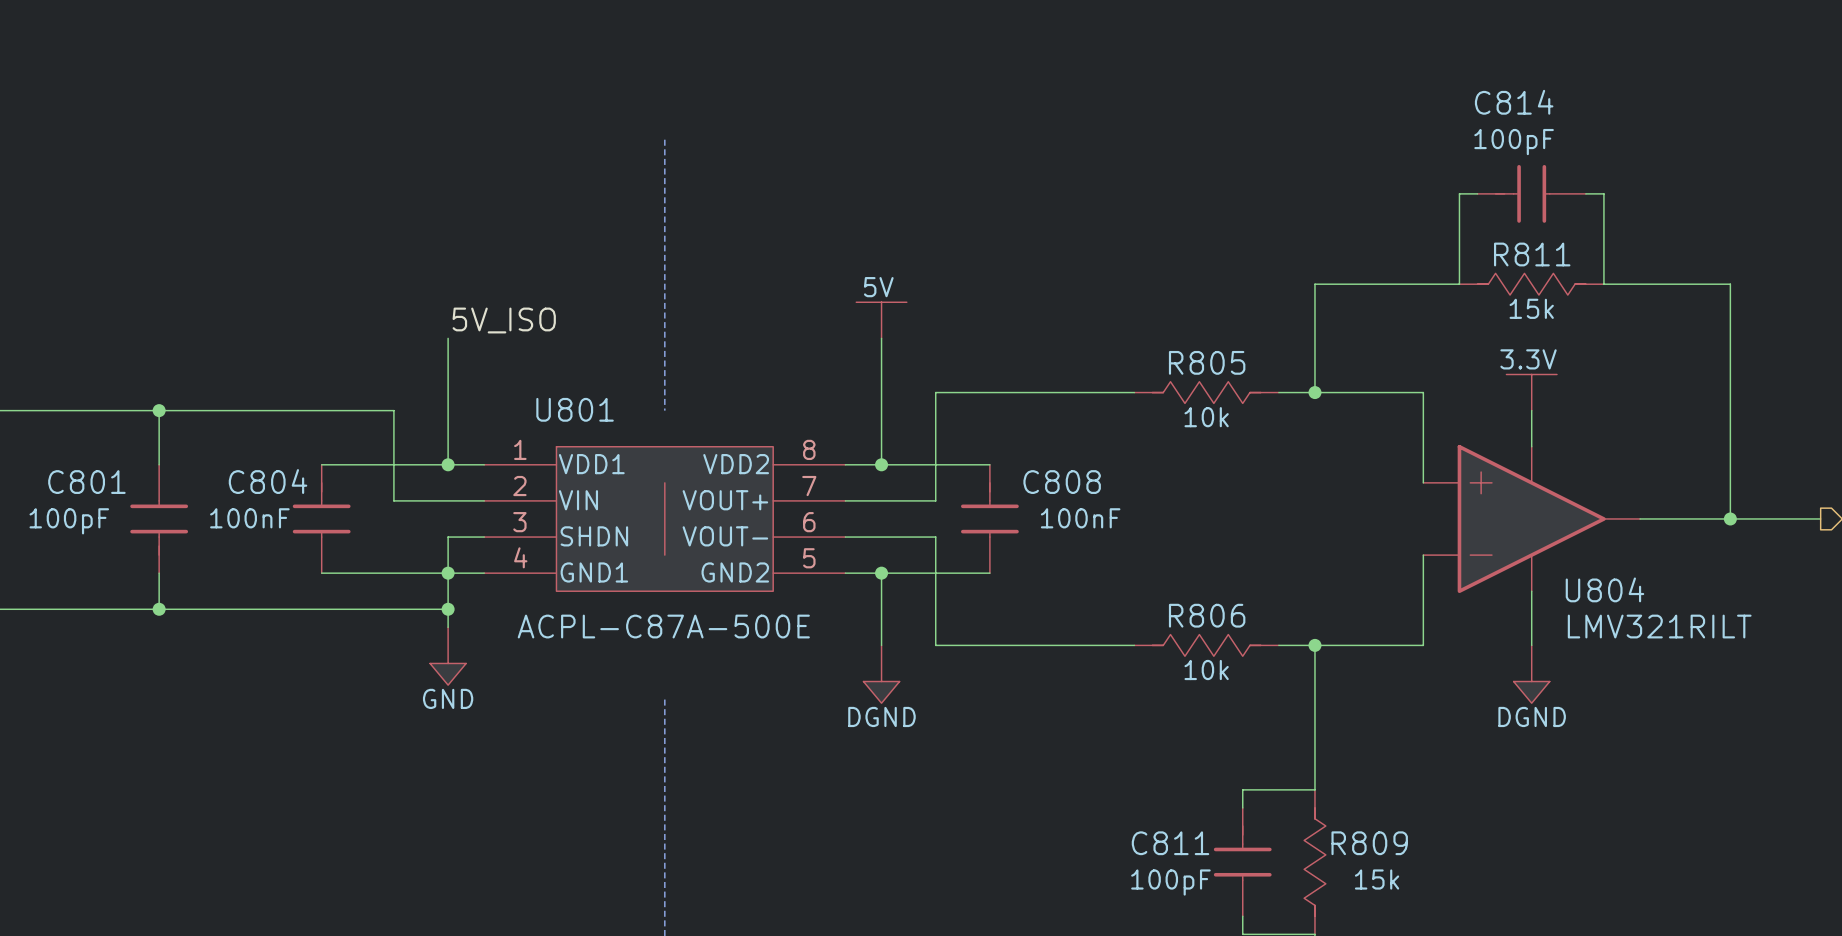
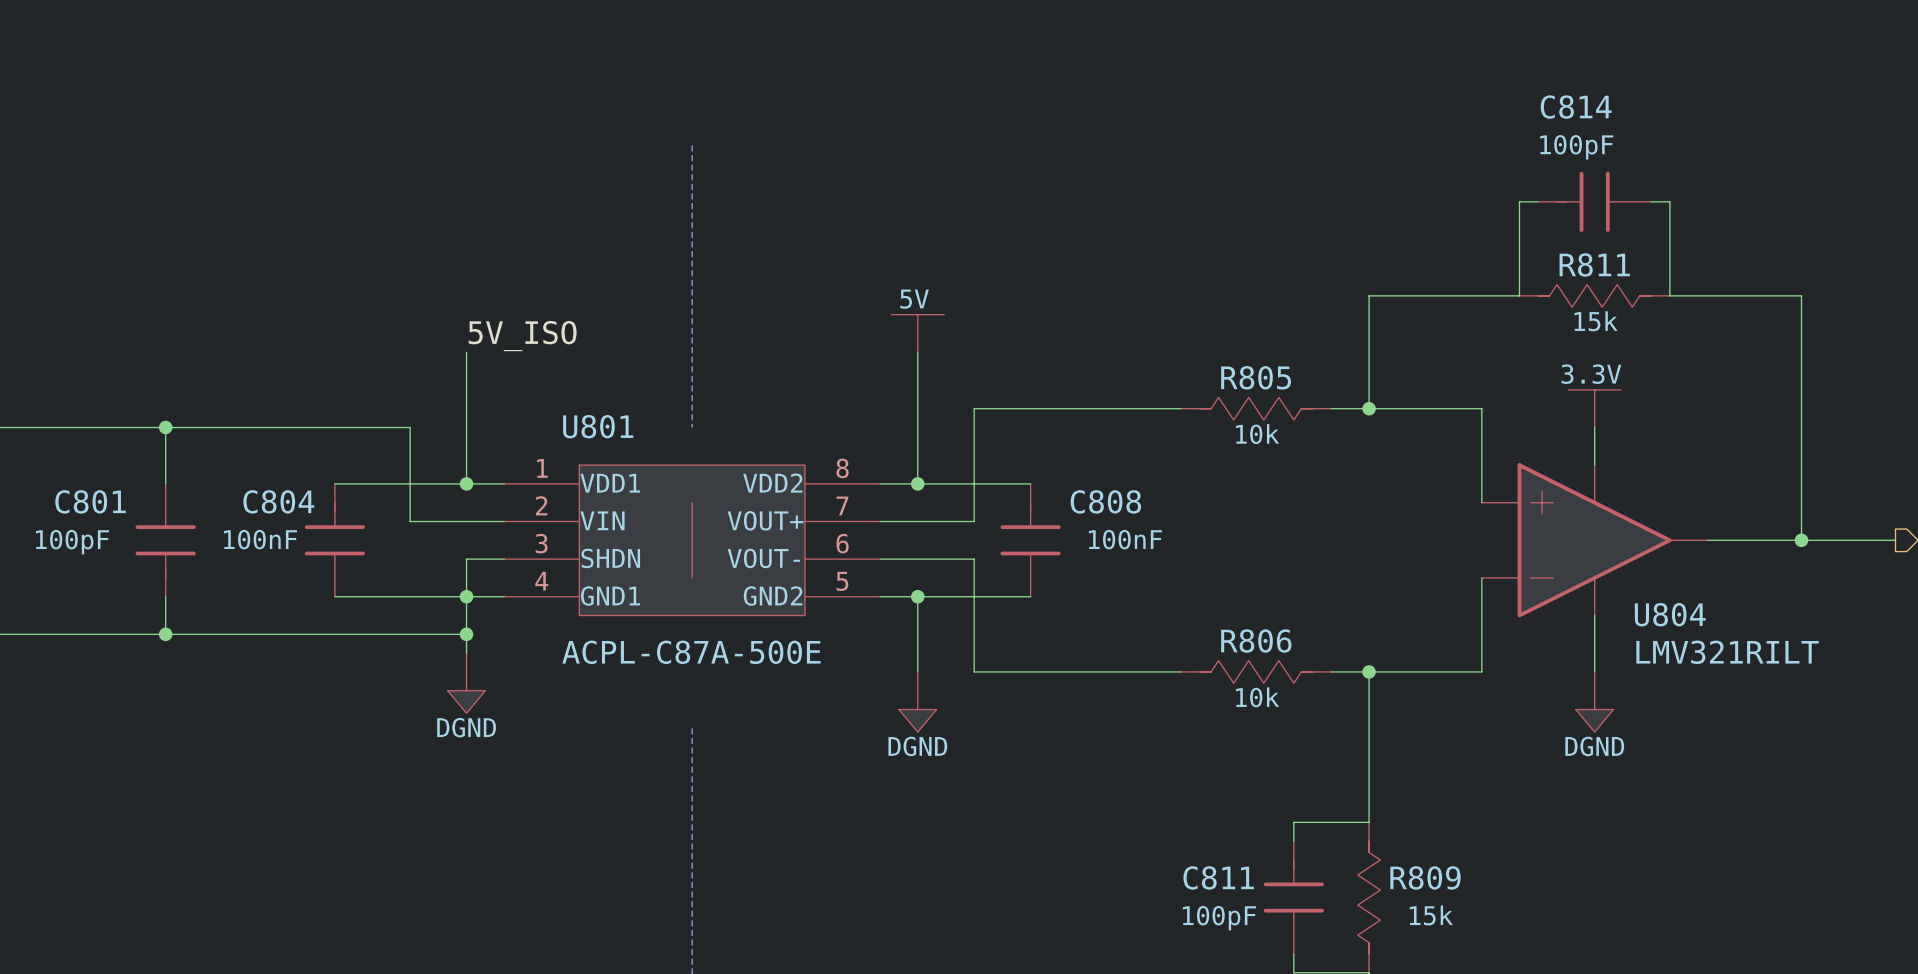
power symbol: GND (448, 656) -> DGND (466, 683)

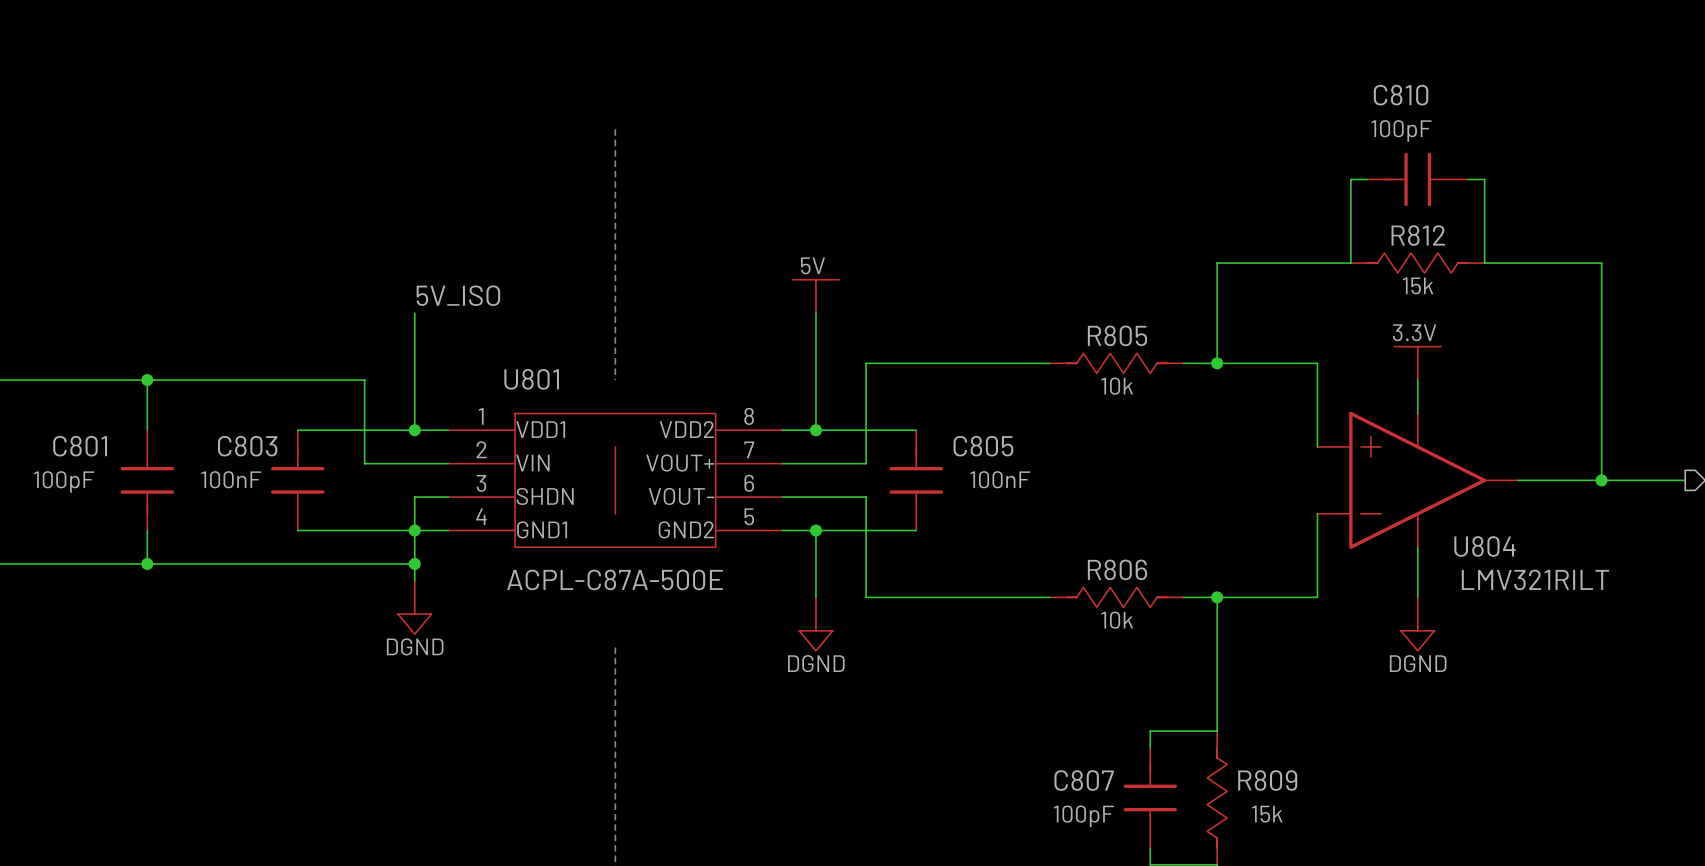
C814 name: C814 (1576, 107) -> C810 (1401, 95)
R811 name: R811 (1594, 264) -> R812 (1418, 235)
C804 name: C804 (278, 501) -> C803 (247, 446)
C808 name: C808 (1105, 501) -> C805 (983, 446)
C811 name: C811 (1218, 877) -> C807 (1084, 780)

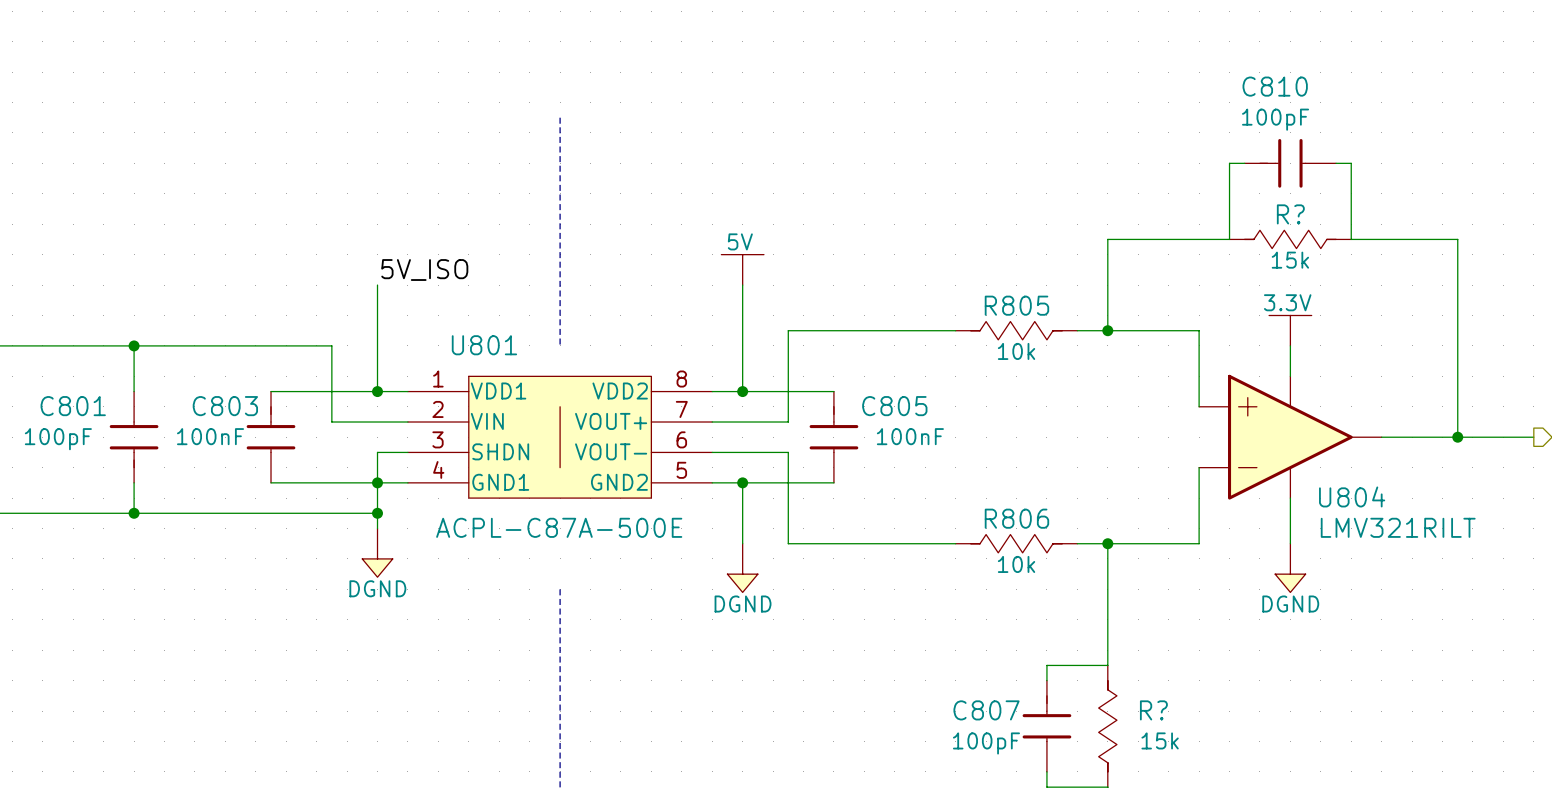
R812 name: R812 (1418, 235) -> R? (1290, 214)
R809 name: R809 (1267, 780) -> R? (1153, 710)

